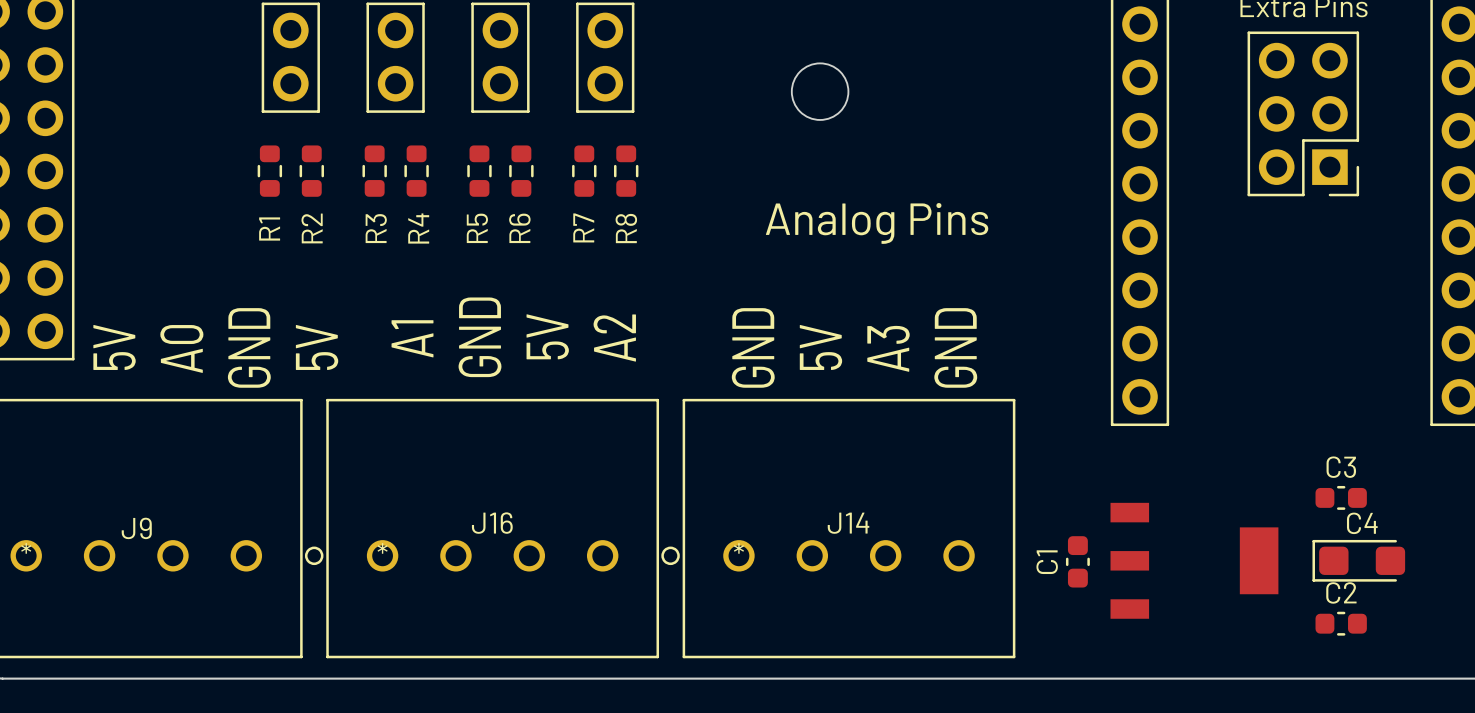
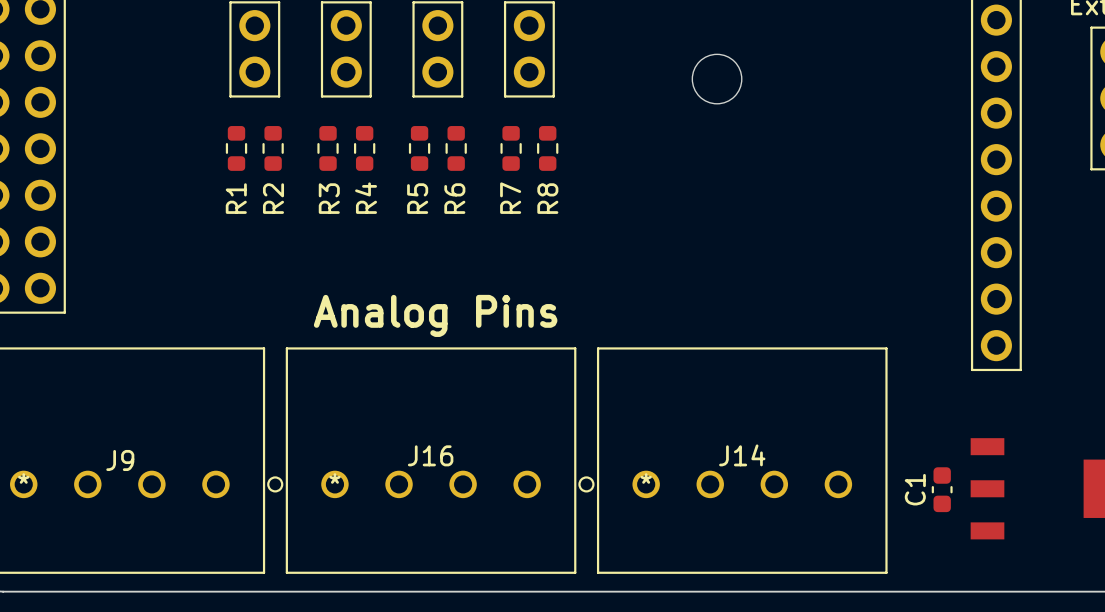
text position: Analog Pins (877, 223) -> Analog Pins (435, 315)
text: 5V (547, 336) -> none
text: GND (480, 337) -> none
text: A1 (412, 338) -> none
text: A2 (614, 338) -> none
text: 5V (114, 347) -> none
text: GND (249, 347) -> none
text: 5V (317, 347) -> none
text: GND (753, 347) -> none
text: 5V (820, 347) -> none
text: GND (955, 347) -> none
text: A3 (888, 348) -> none
text: A0 (181, 349) -> none

